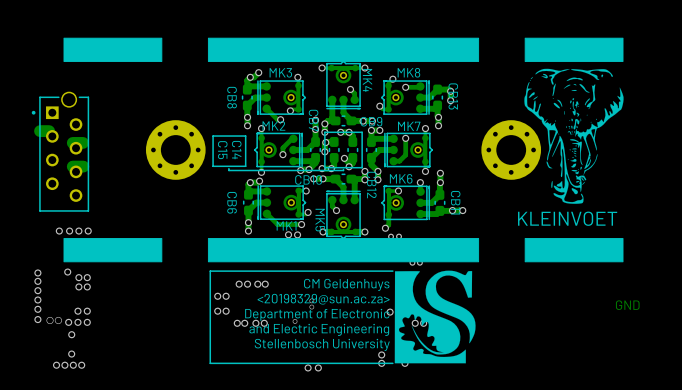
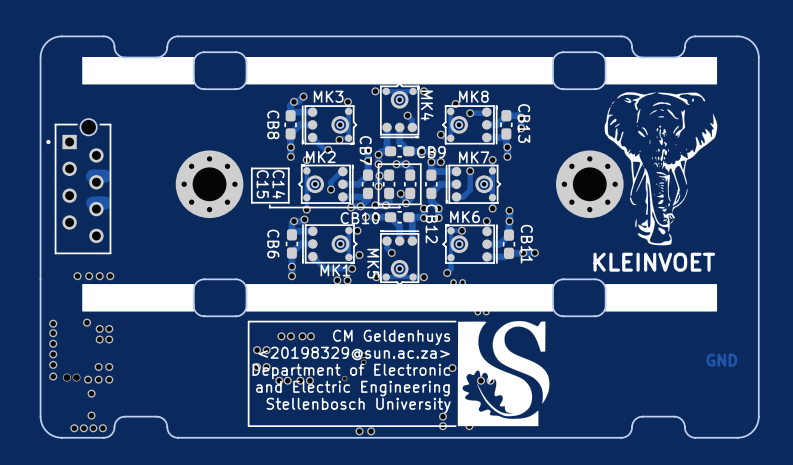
board edge: none -> (737, 36) (692, 36) (686, 41) (681, 54) (674, 57) (638, 56) (633, 52) (629, 40) (621, 36) (177, 36) (170, 39) (165, 53) (156, 57) (121, 56) (115, 52) (112, 40) (105, 36) (61, 36) (51, 39) (43, 46) (40, 57) (40, 416) (43, 427) (48, 433) (58, 437) (105, 437) (112, 433) (115, 421) (121, 417) (156, 416) (164, 419) (169, 433) (177, 437) (621, 437) (629, 433) (633, 421) (638, 417) (674, 416) (681, 419) (686, 432) (692, 437) (737, 437) (748, 434) (755, 427) (758, 416) (758, 57) (757, 49) (752, 42) (745, 38) (737, 36)
board edge: none -> (235, 52) (204, 52) (197, 54) (193, 62) (193, 80) (195, 85) (204, 89) (235, 89) (242, 87) (246, 80) (246, 61) (243, 55) (235, 52)
board edge: none -> (595, 52) (563, 52) (556, 54) (552, 62) (552, 80) (555, 85) (563, 89) (595, 89) (601, 87) (605, 80) (605, 61) (602, 55) (595, 52)
track: (49, 131) (40, 131) -> none
board edge: none -> (235, 279) (204, 279) (197, 281) (193, 289) (193, 307) (195, 312) (204, 316) (235, 316) (242, 314) (246, 307) (246, 288) (243, 282) (235, 279)
board edge: none -> (595, 279) (563, 279) (556, 281) (552, 289) (552, 307) (555, 312) (563, 316) (595, 316) (601, 314) (605, 307) (605, 288) (602, 282) (595, 279)

